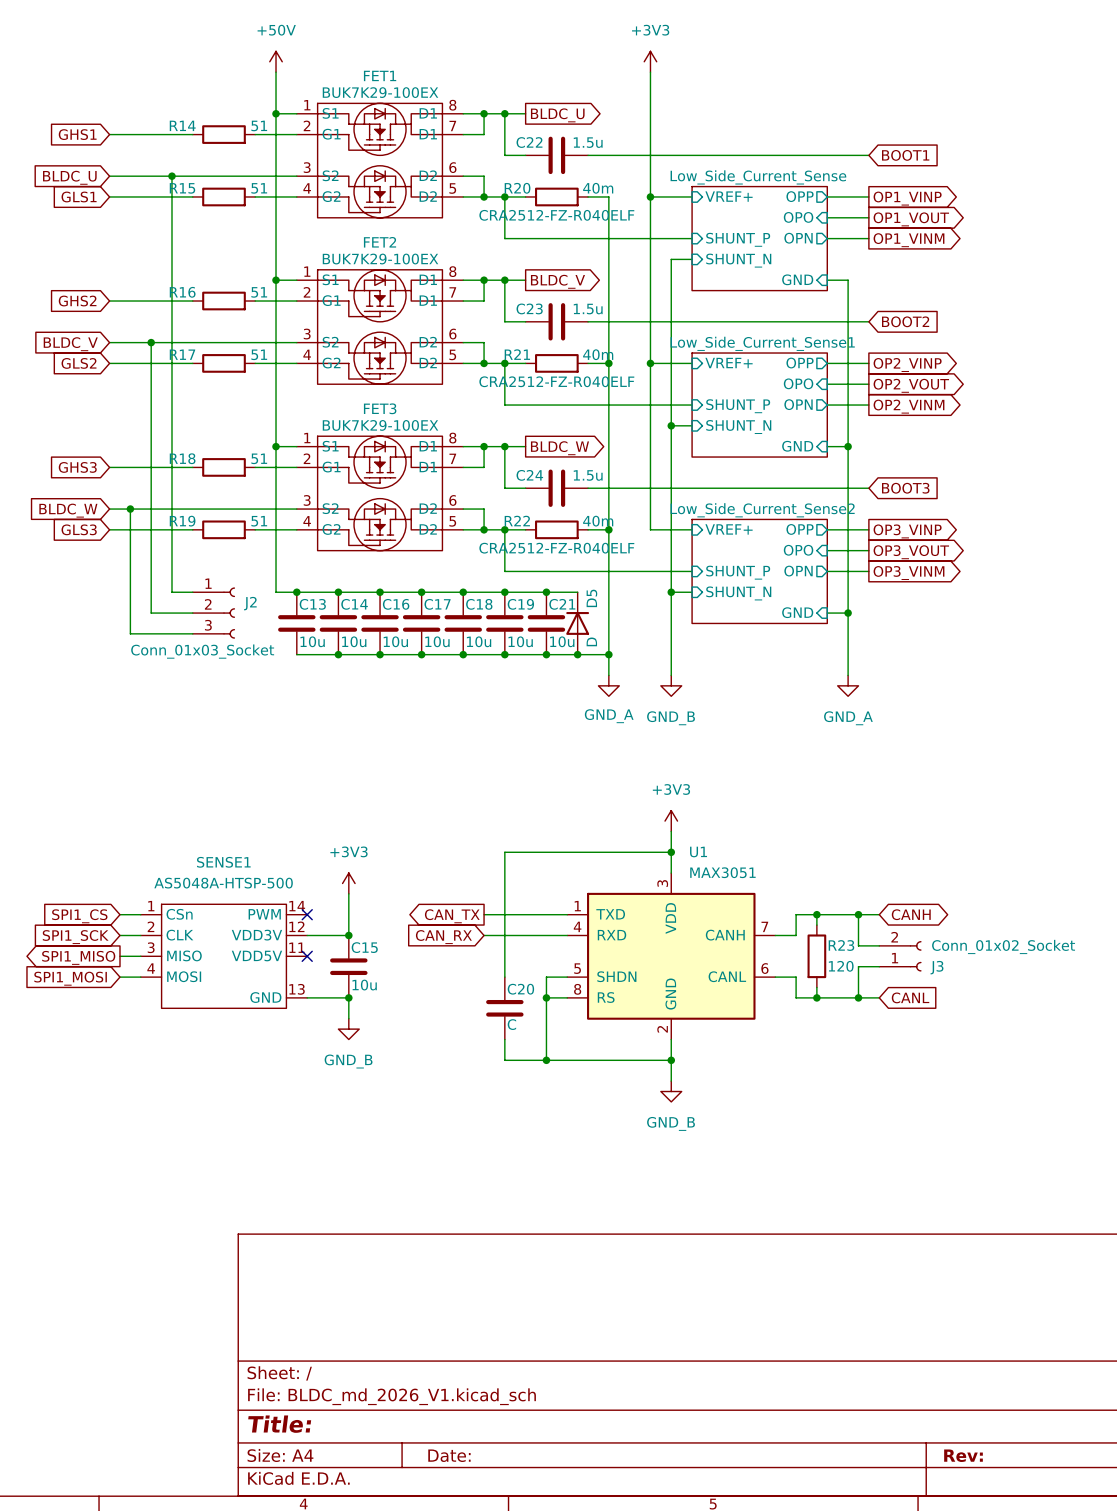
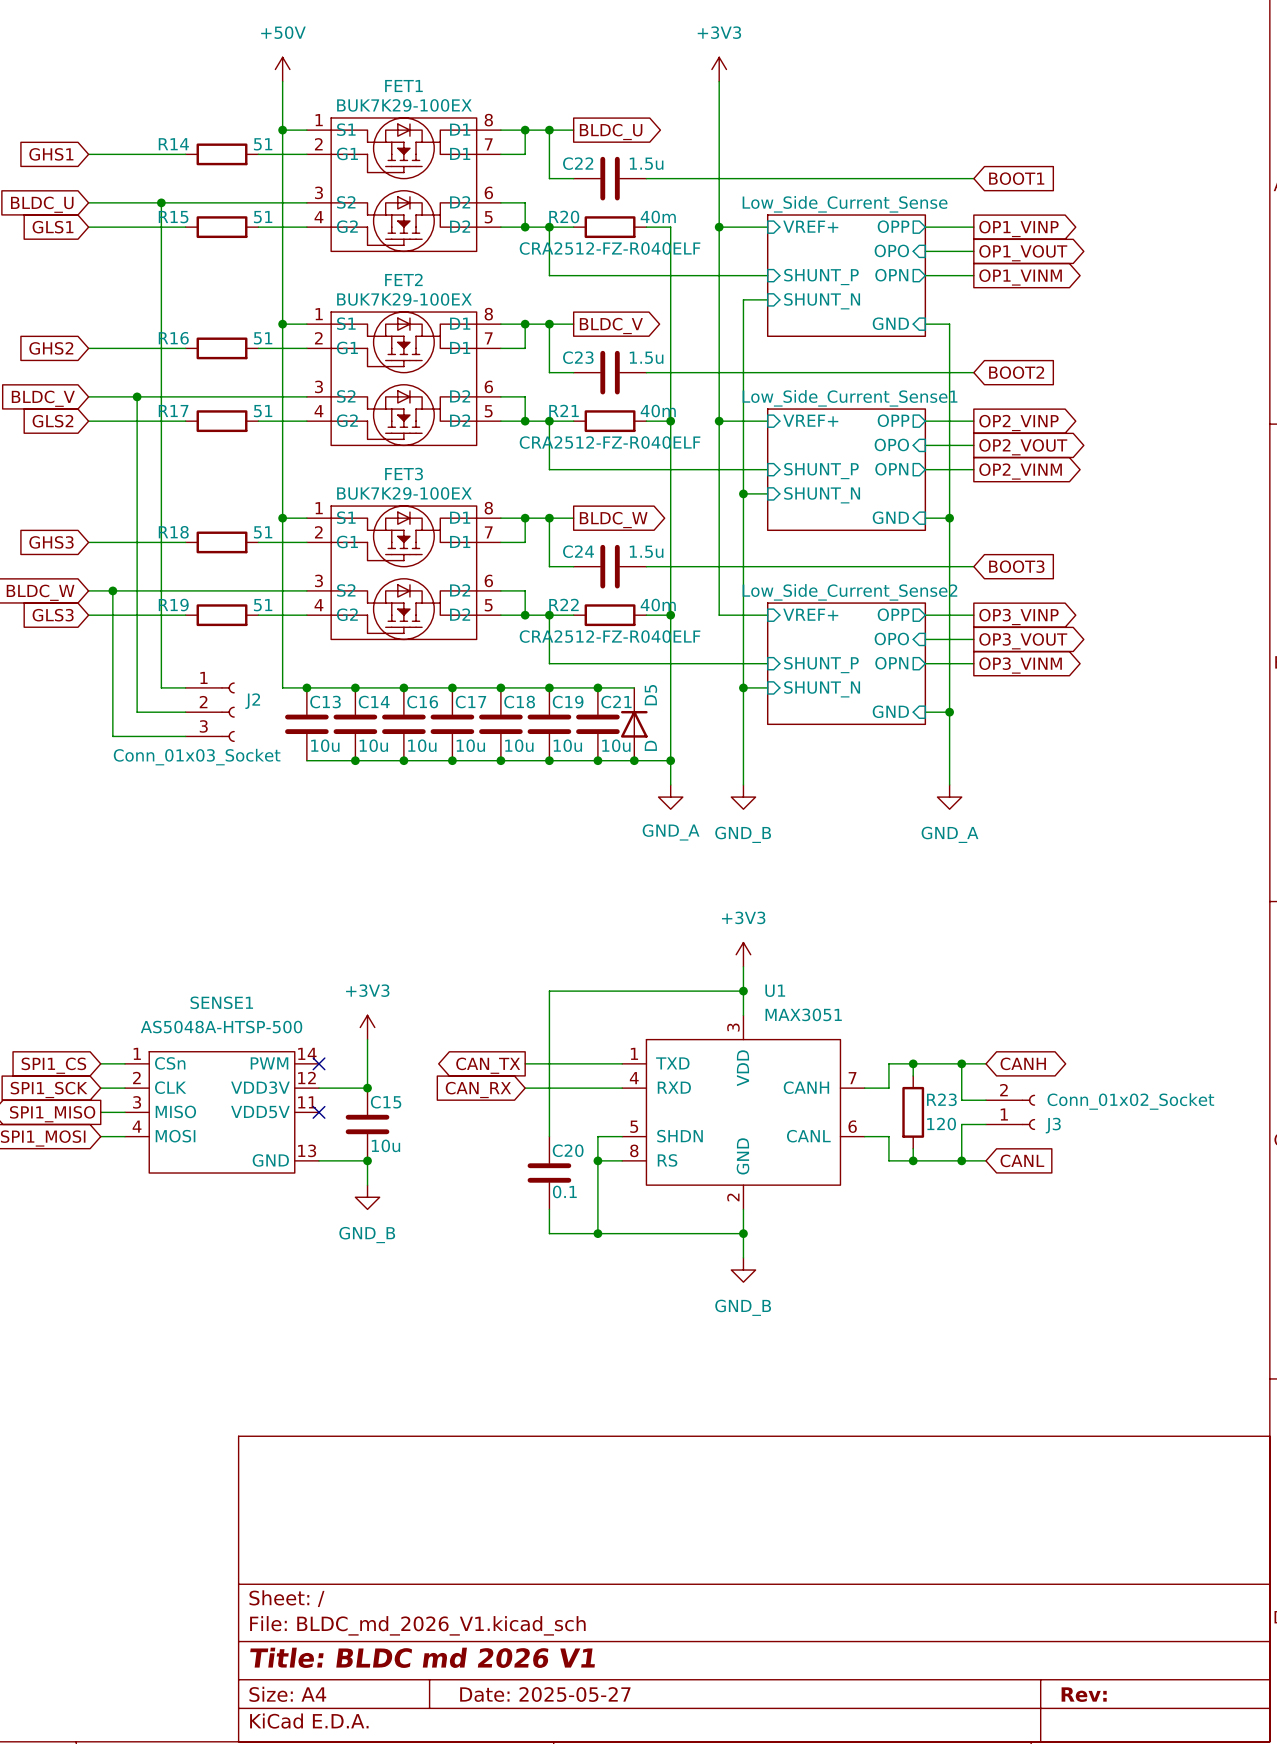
U1 symbol: [567, 873, 776, 1040] -> [622, 1015, 865, 1210]
C20 value: C (511, 1024) -> 0.1 (564, 1191)
title block: Title: (279, 1424) -> Title: BLDC md 2026 V1 (422, 1657)
title block: Date: (449, 1455) -> Date: 2025-05-27 (545, 1694)

